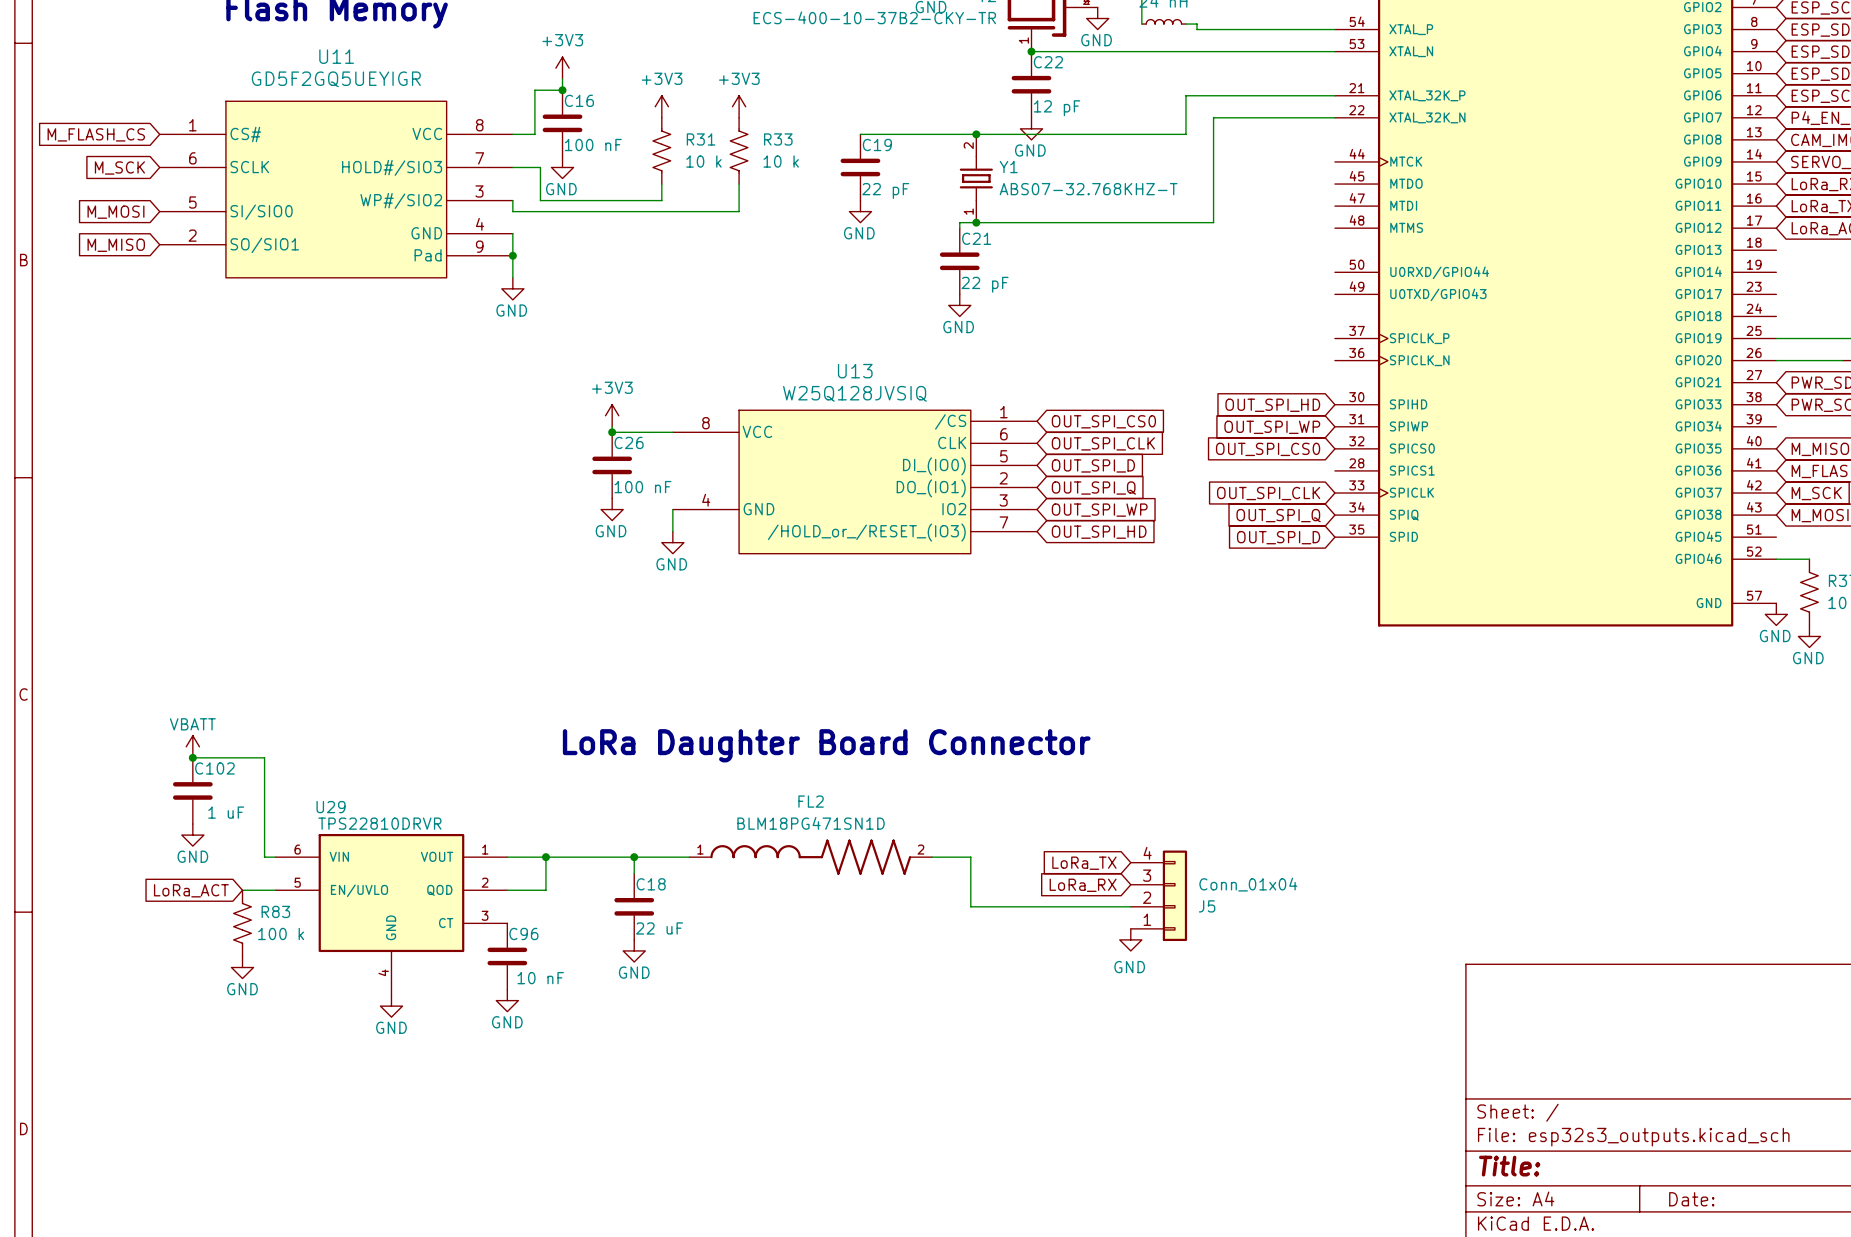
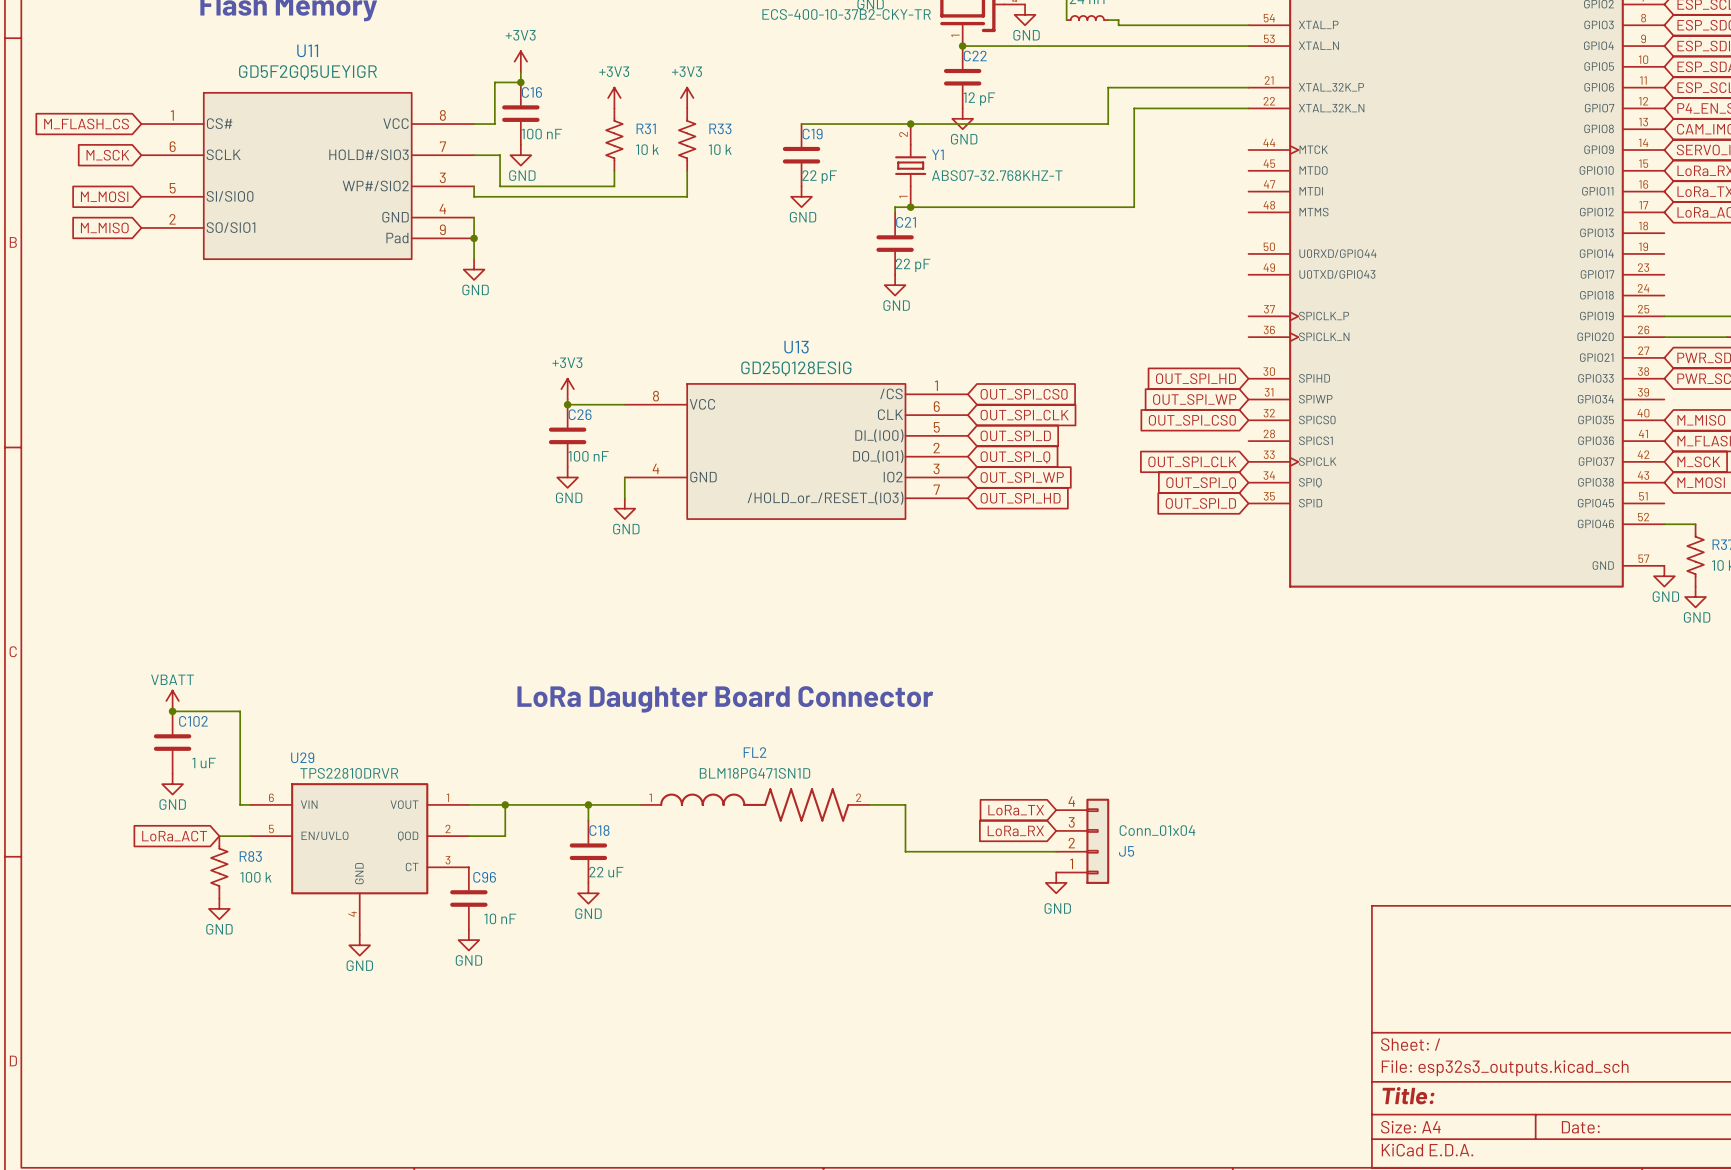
U13 value: W25Q128JVSIQ (854, 393) -> GD25Q128ESIG (796, 368)

